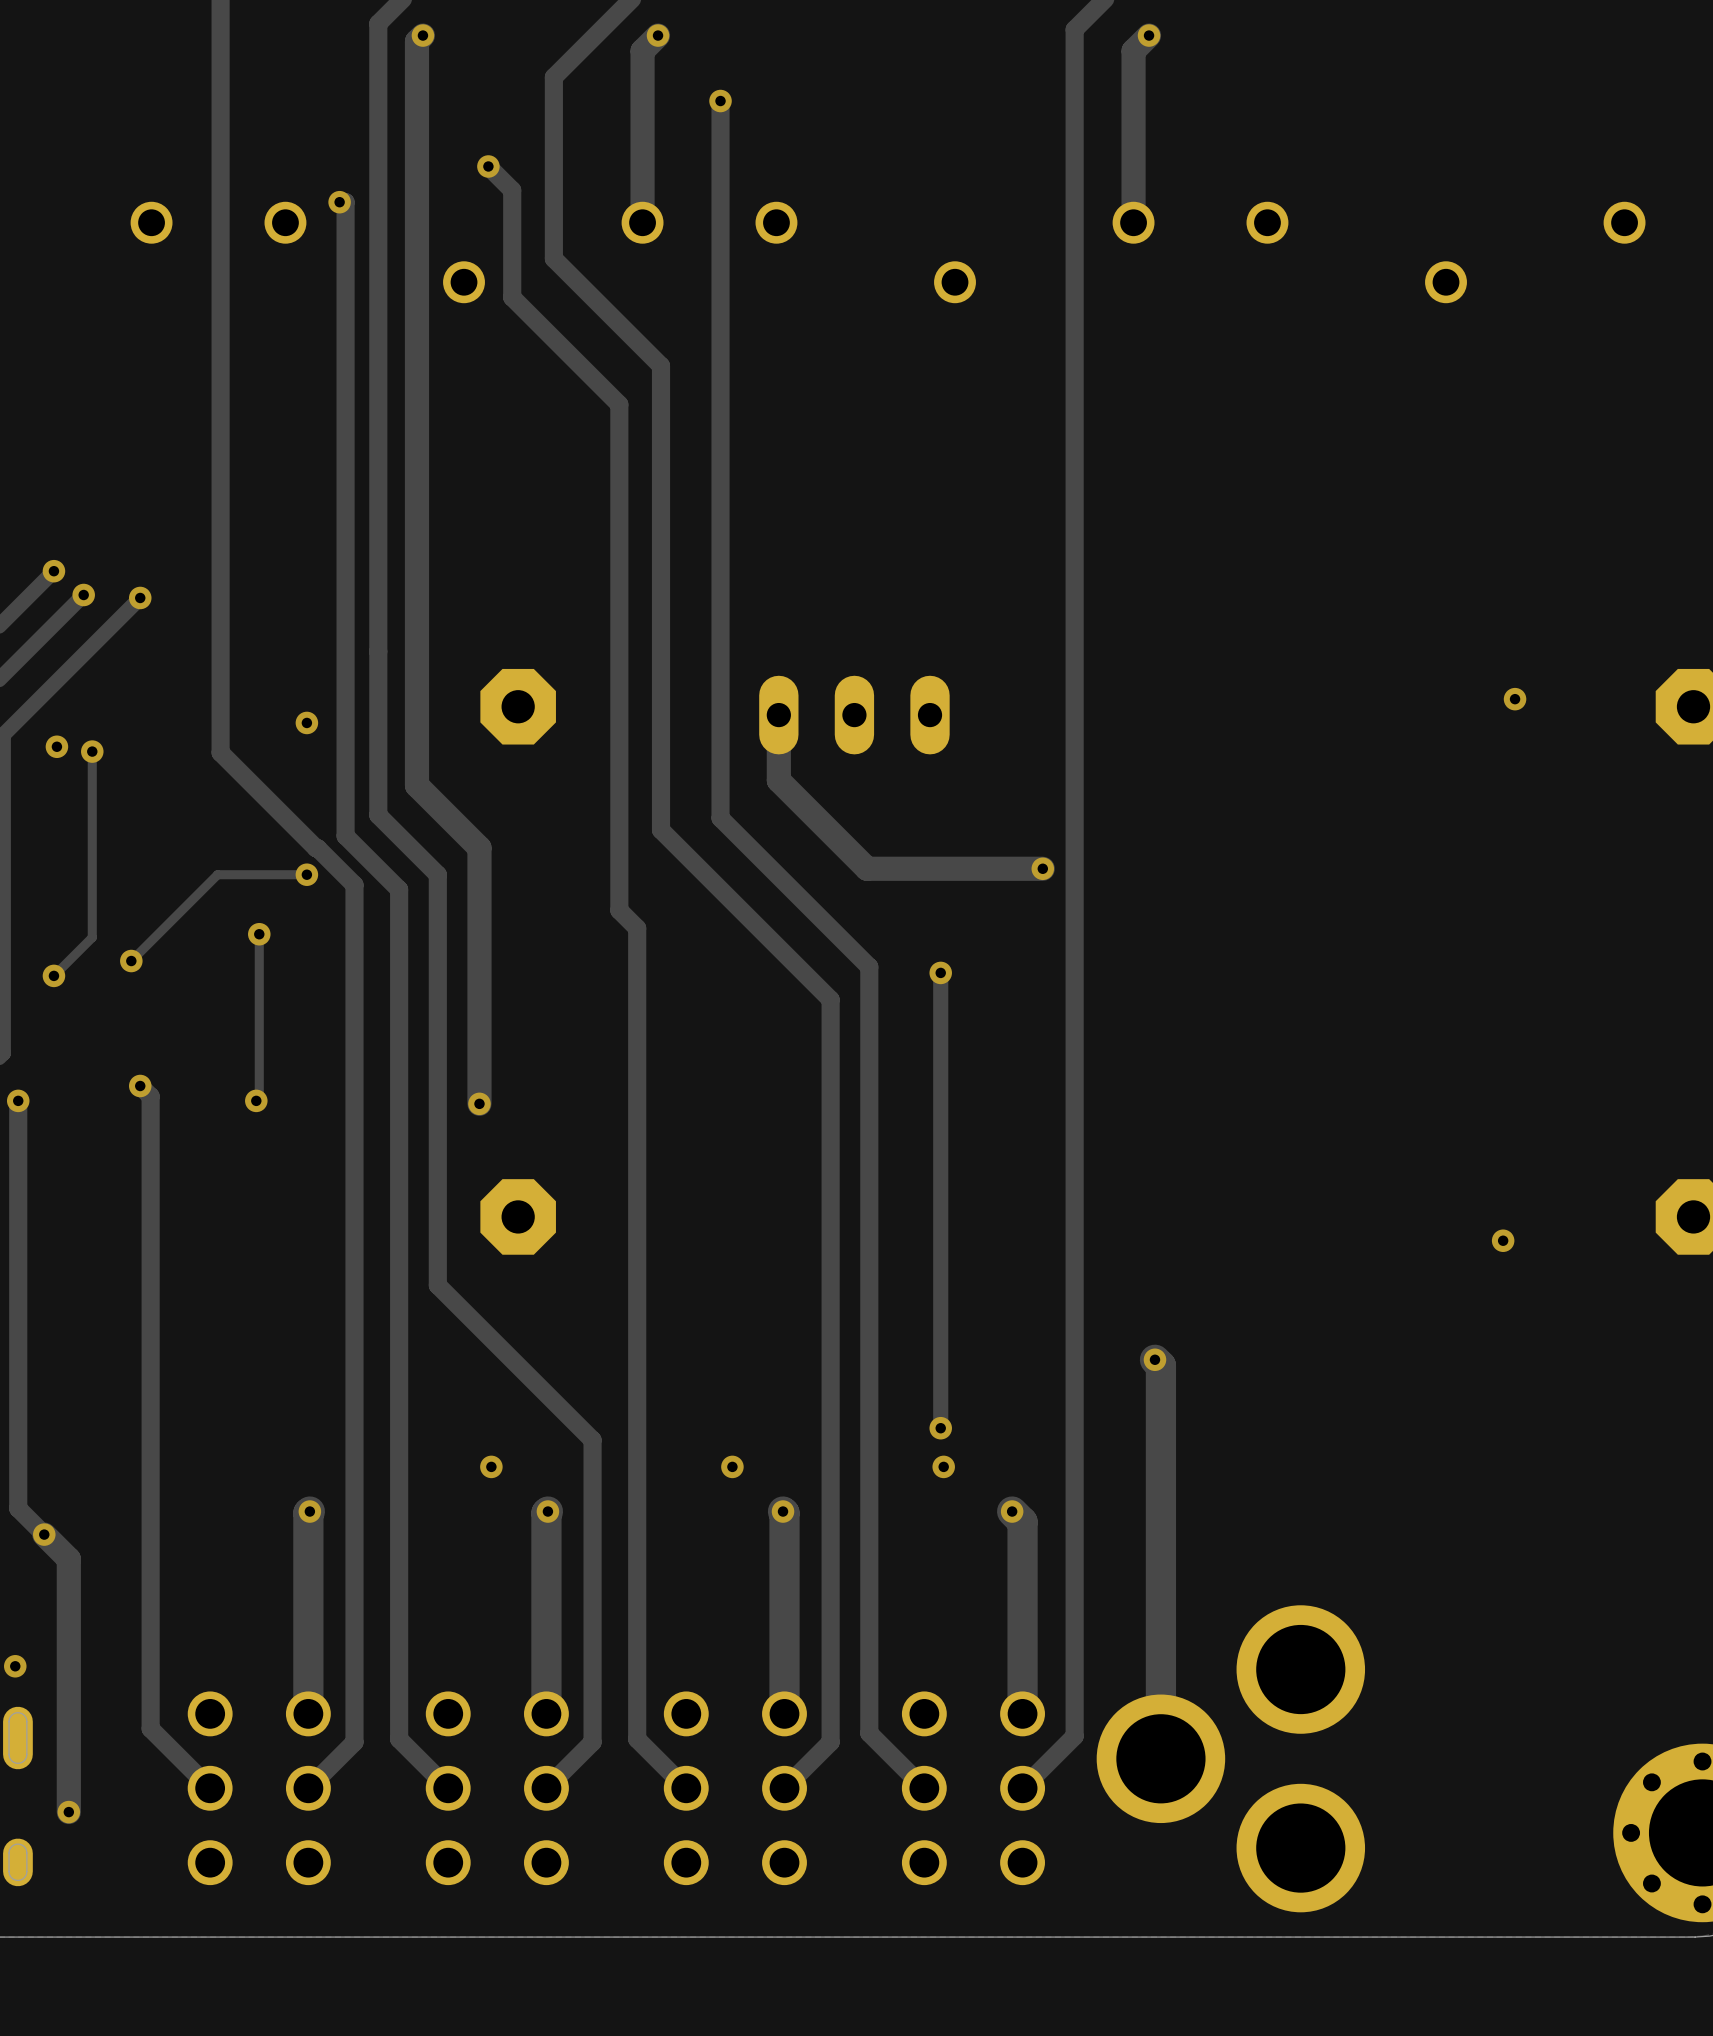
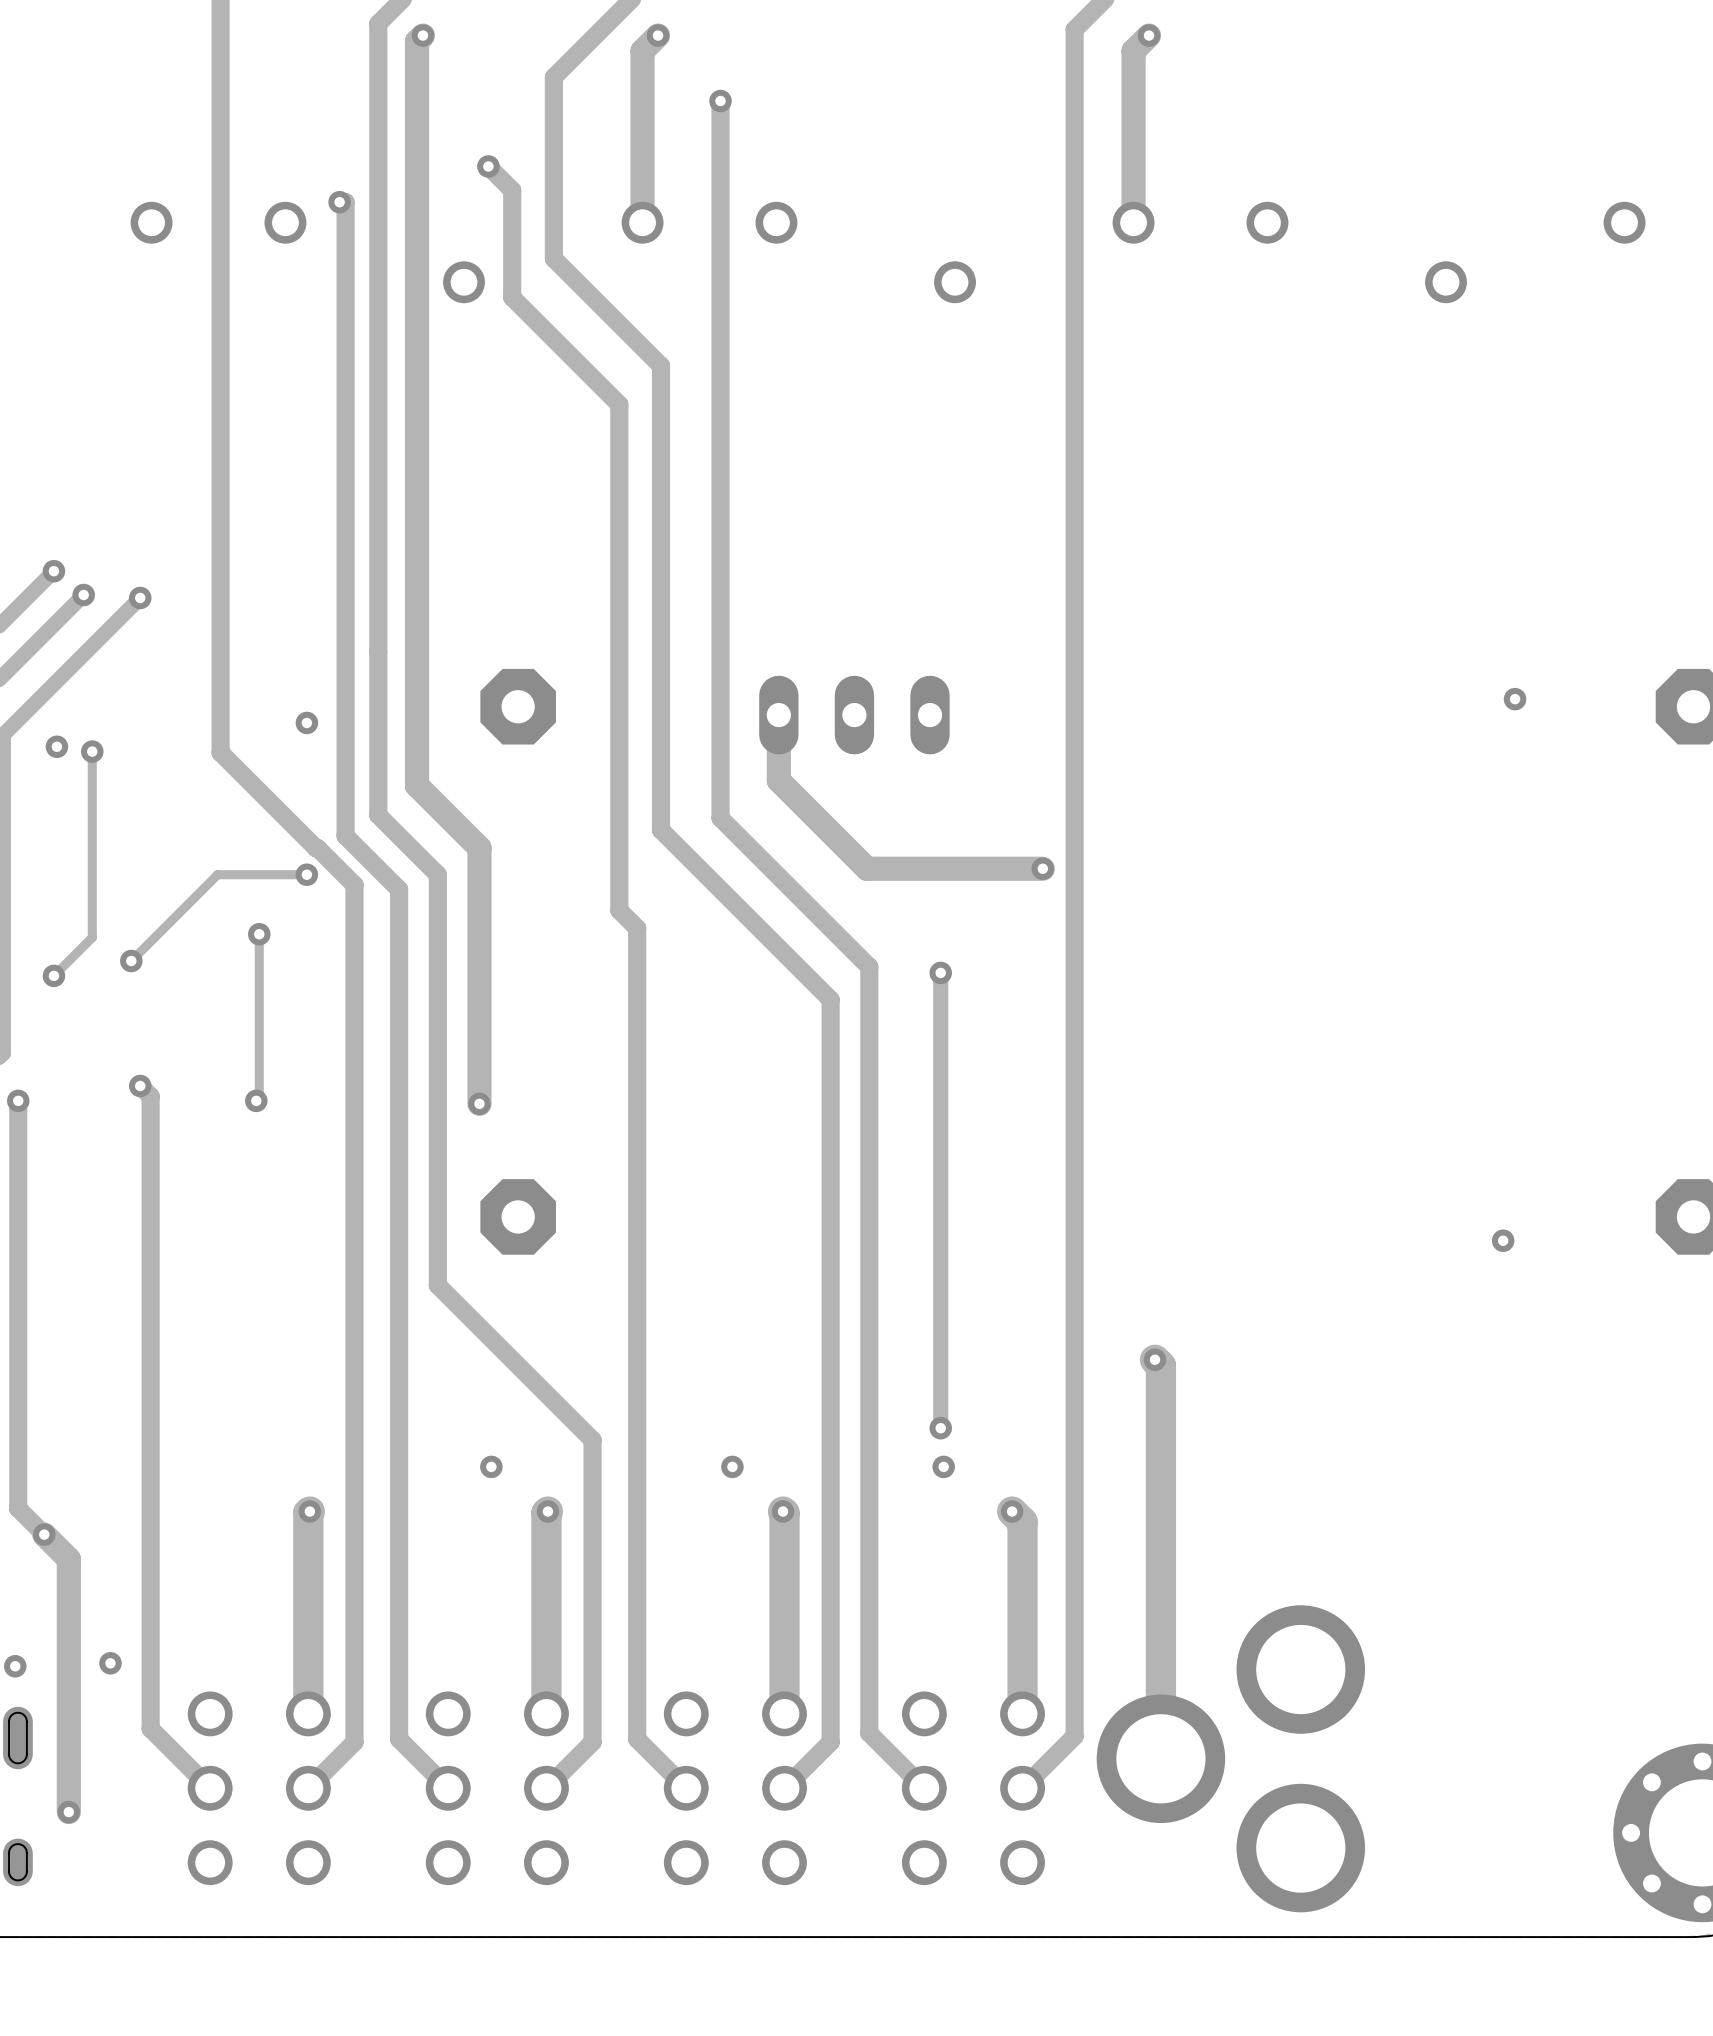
via: none -> (110, 1663)

